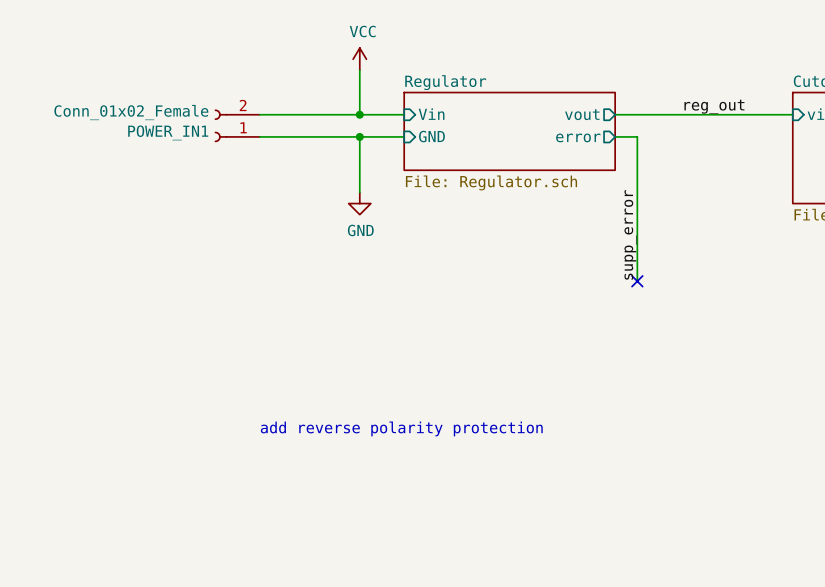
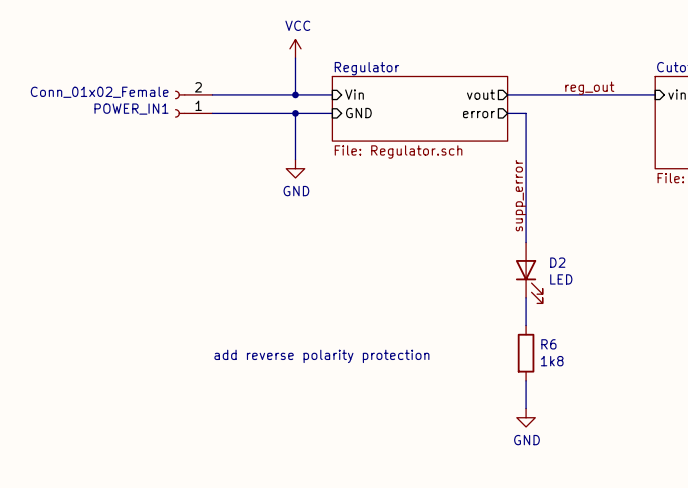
wire: none -> (526, 233) (526, 242)
no-connect mark: (637, 281) -> none
D2: none -> LED (529, 272)
wire: none -> (526, 297) (526, 325)
R6: none -> 1k8 (526, 353)
wire: none -> (526, 380) (526, 408)
power symbol: none -> GND (526, 417)

